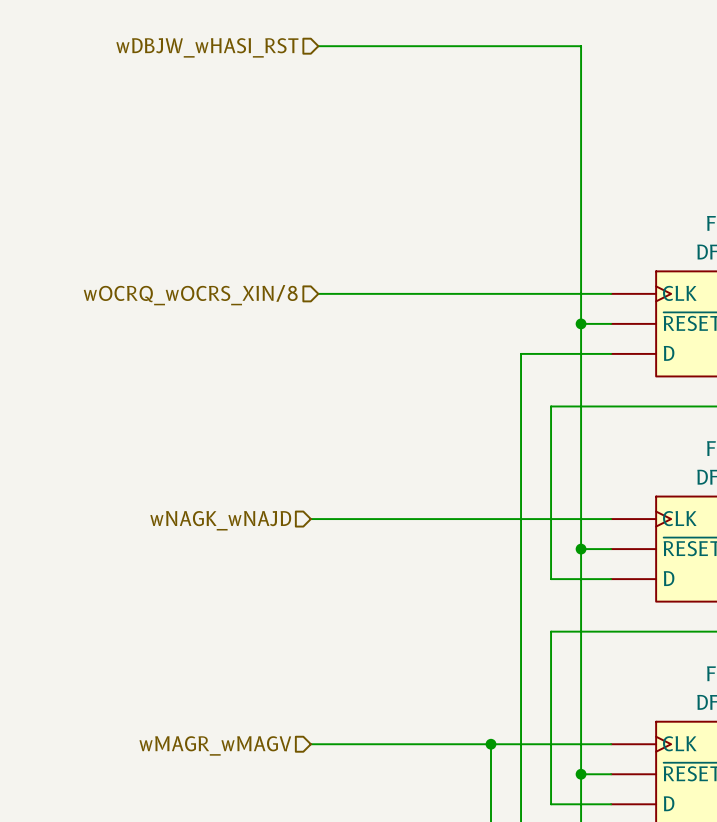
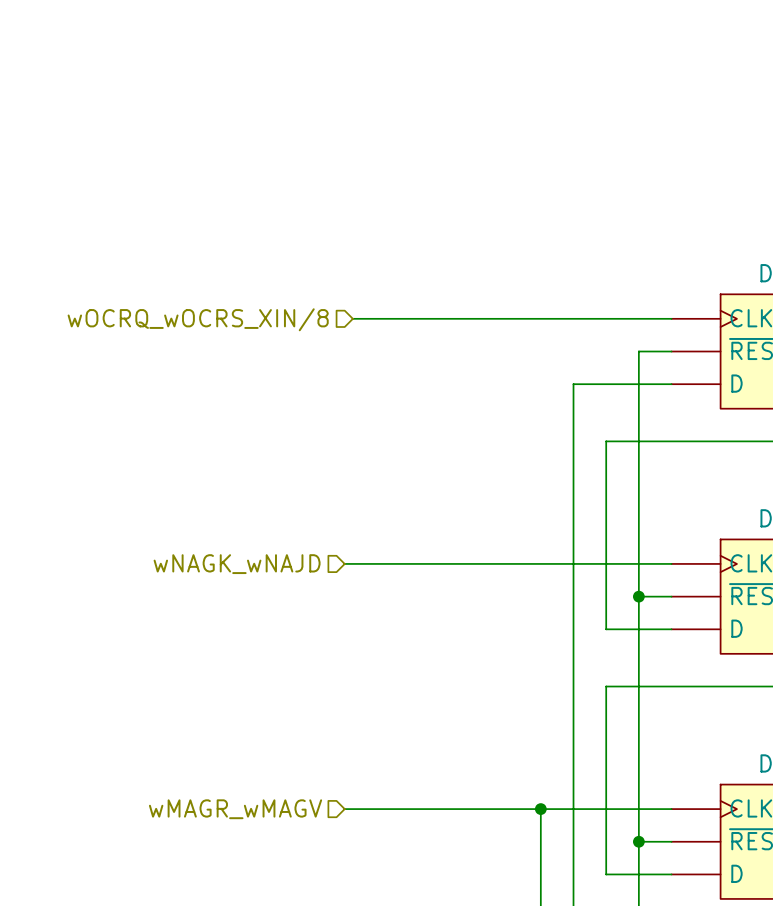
wire: (318, 46) (581, 46) (581, 323) -> none
hierarchical label: wDBJW_wHASI_RST (207, 47) -> none
junction: (581, 323) -> none

